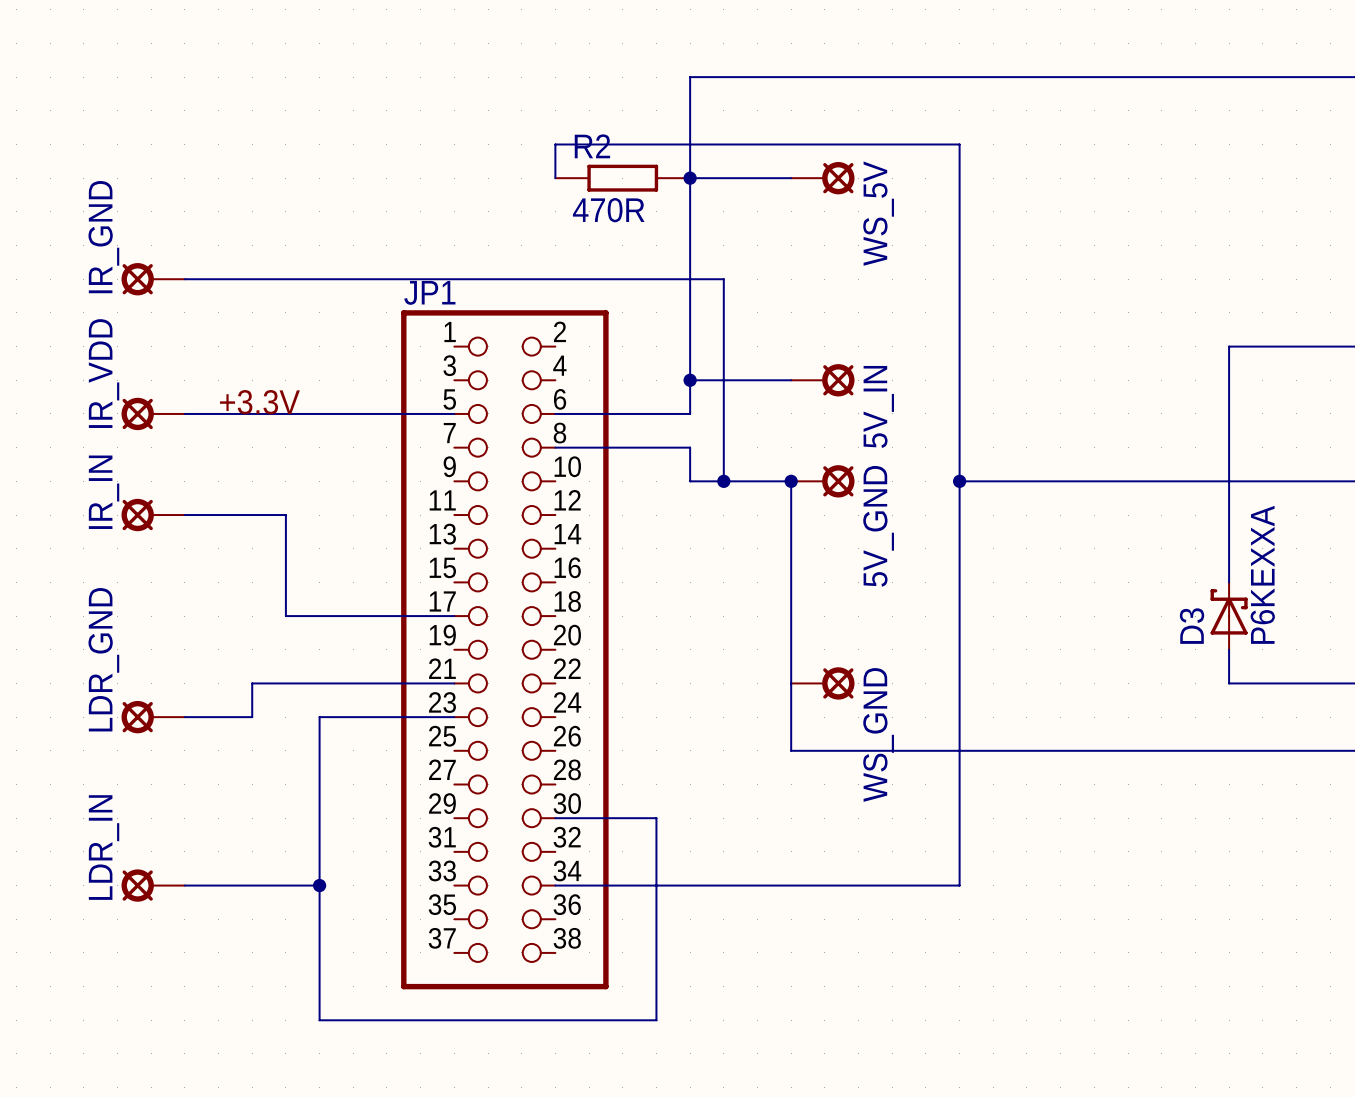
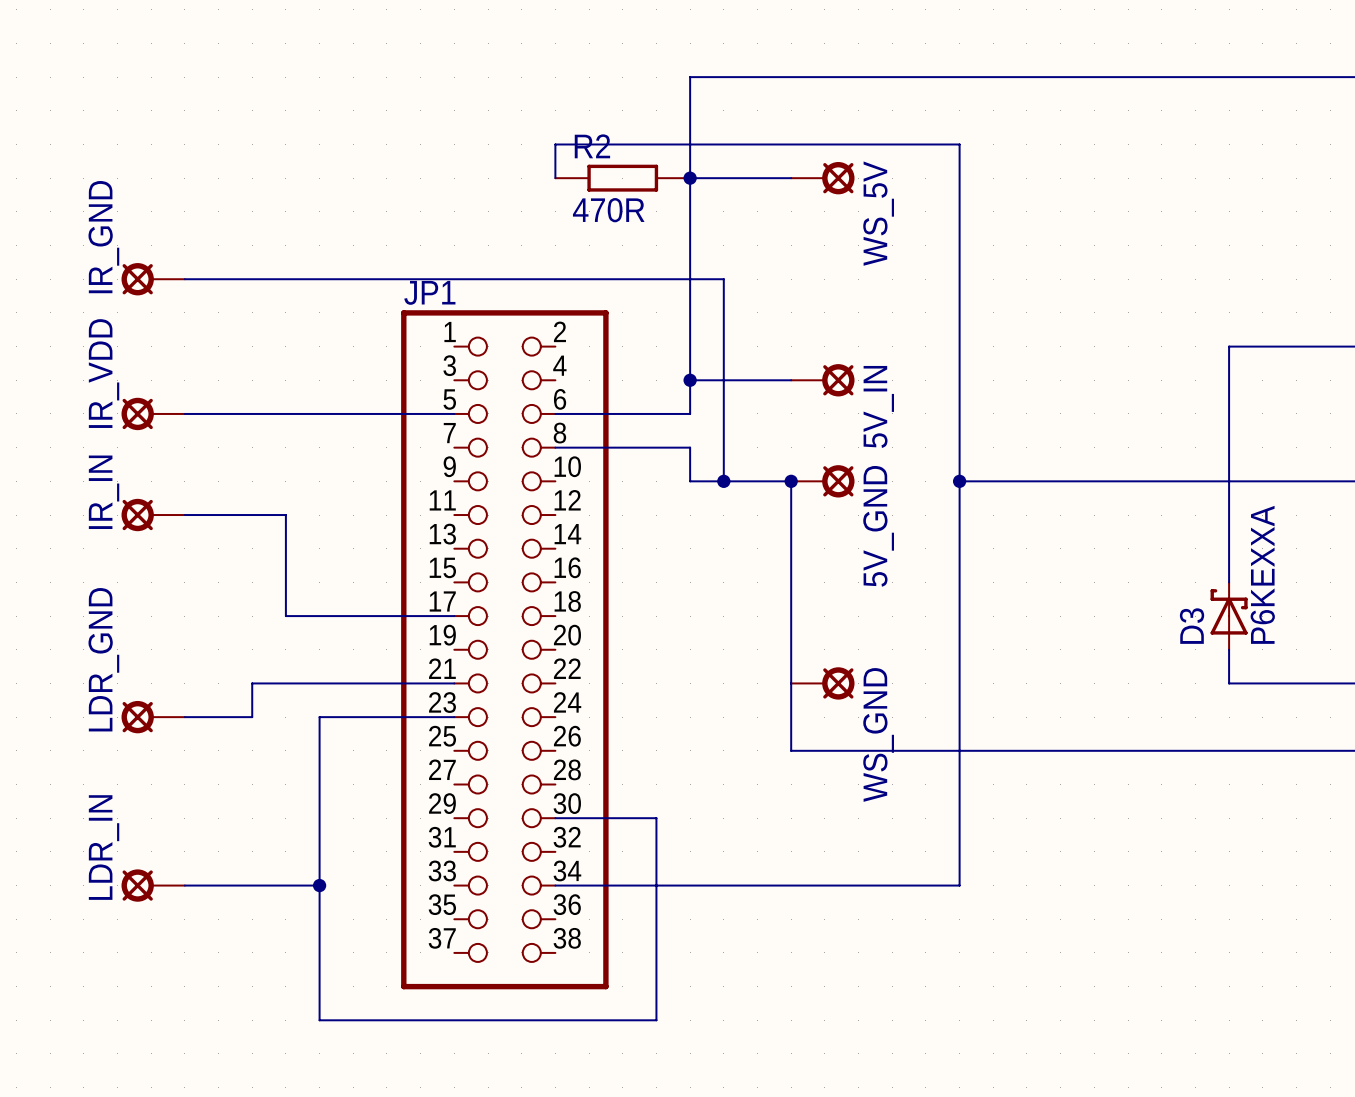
label: +3.3V (259, 402) -> none

